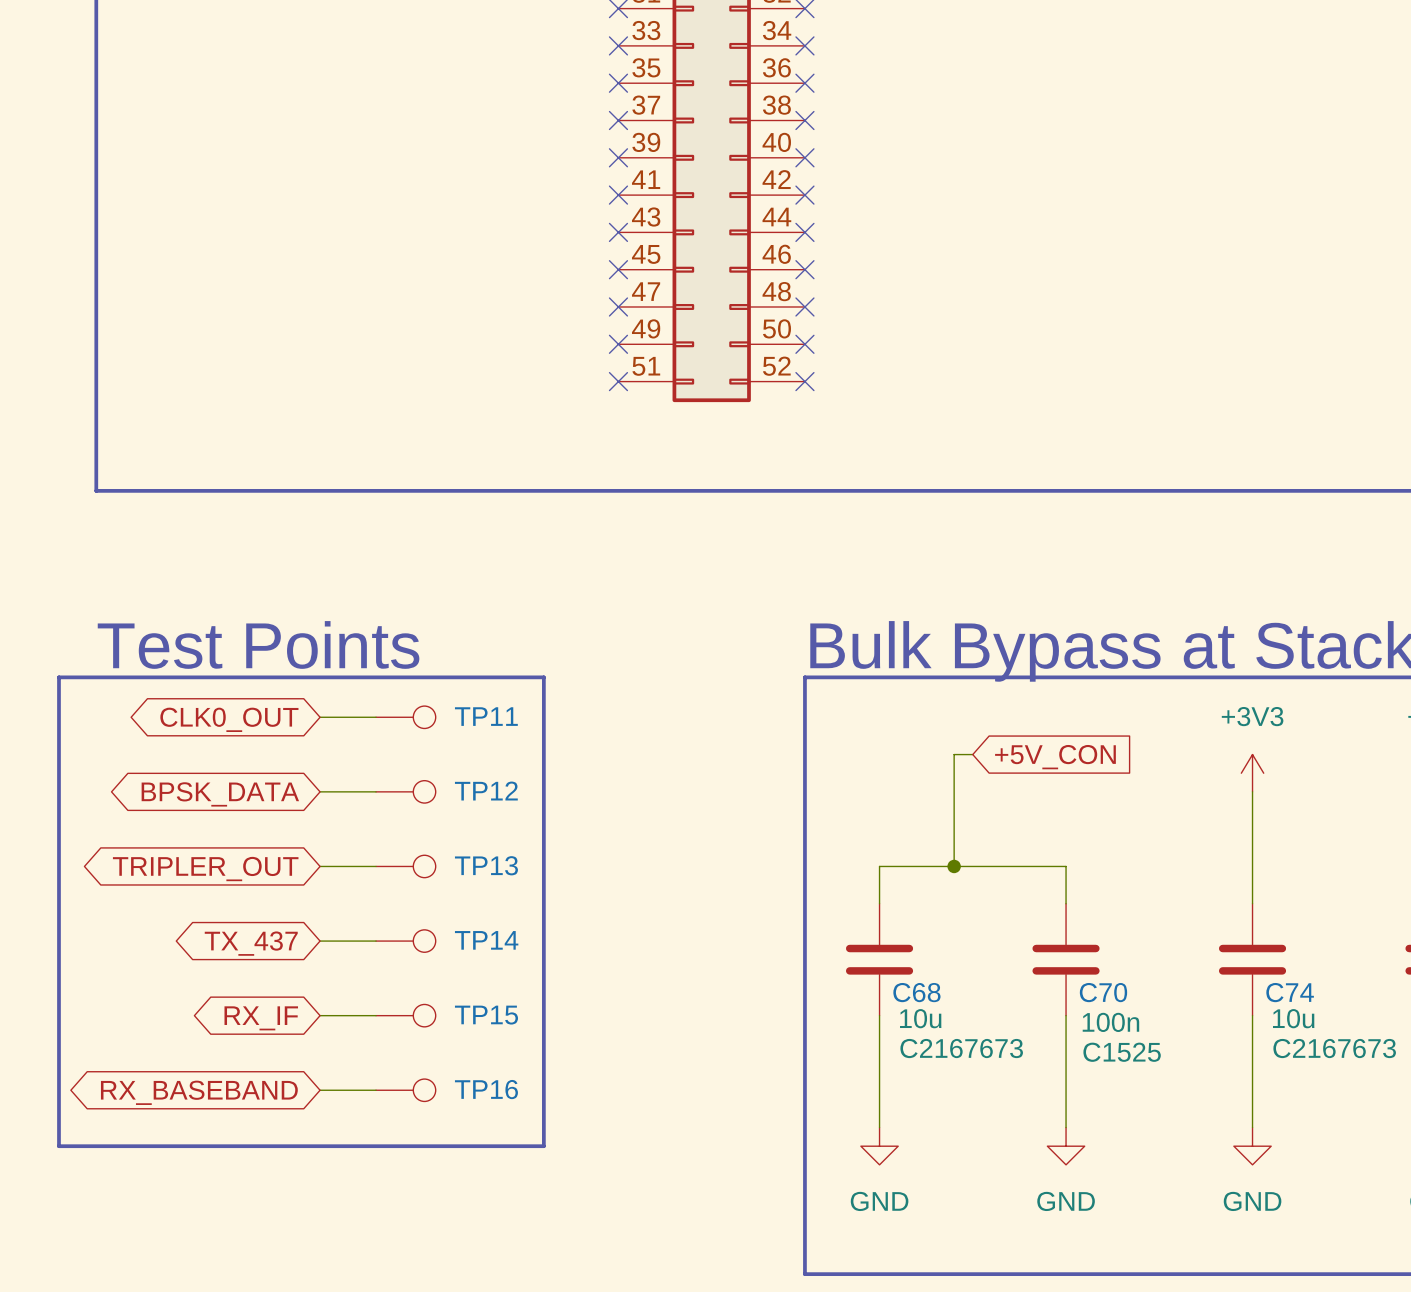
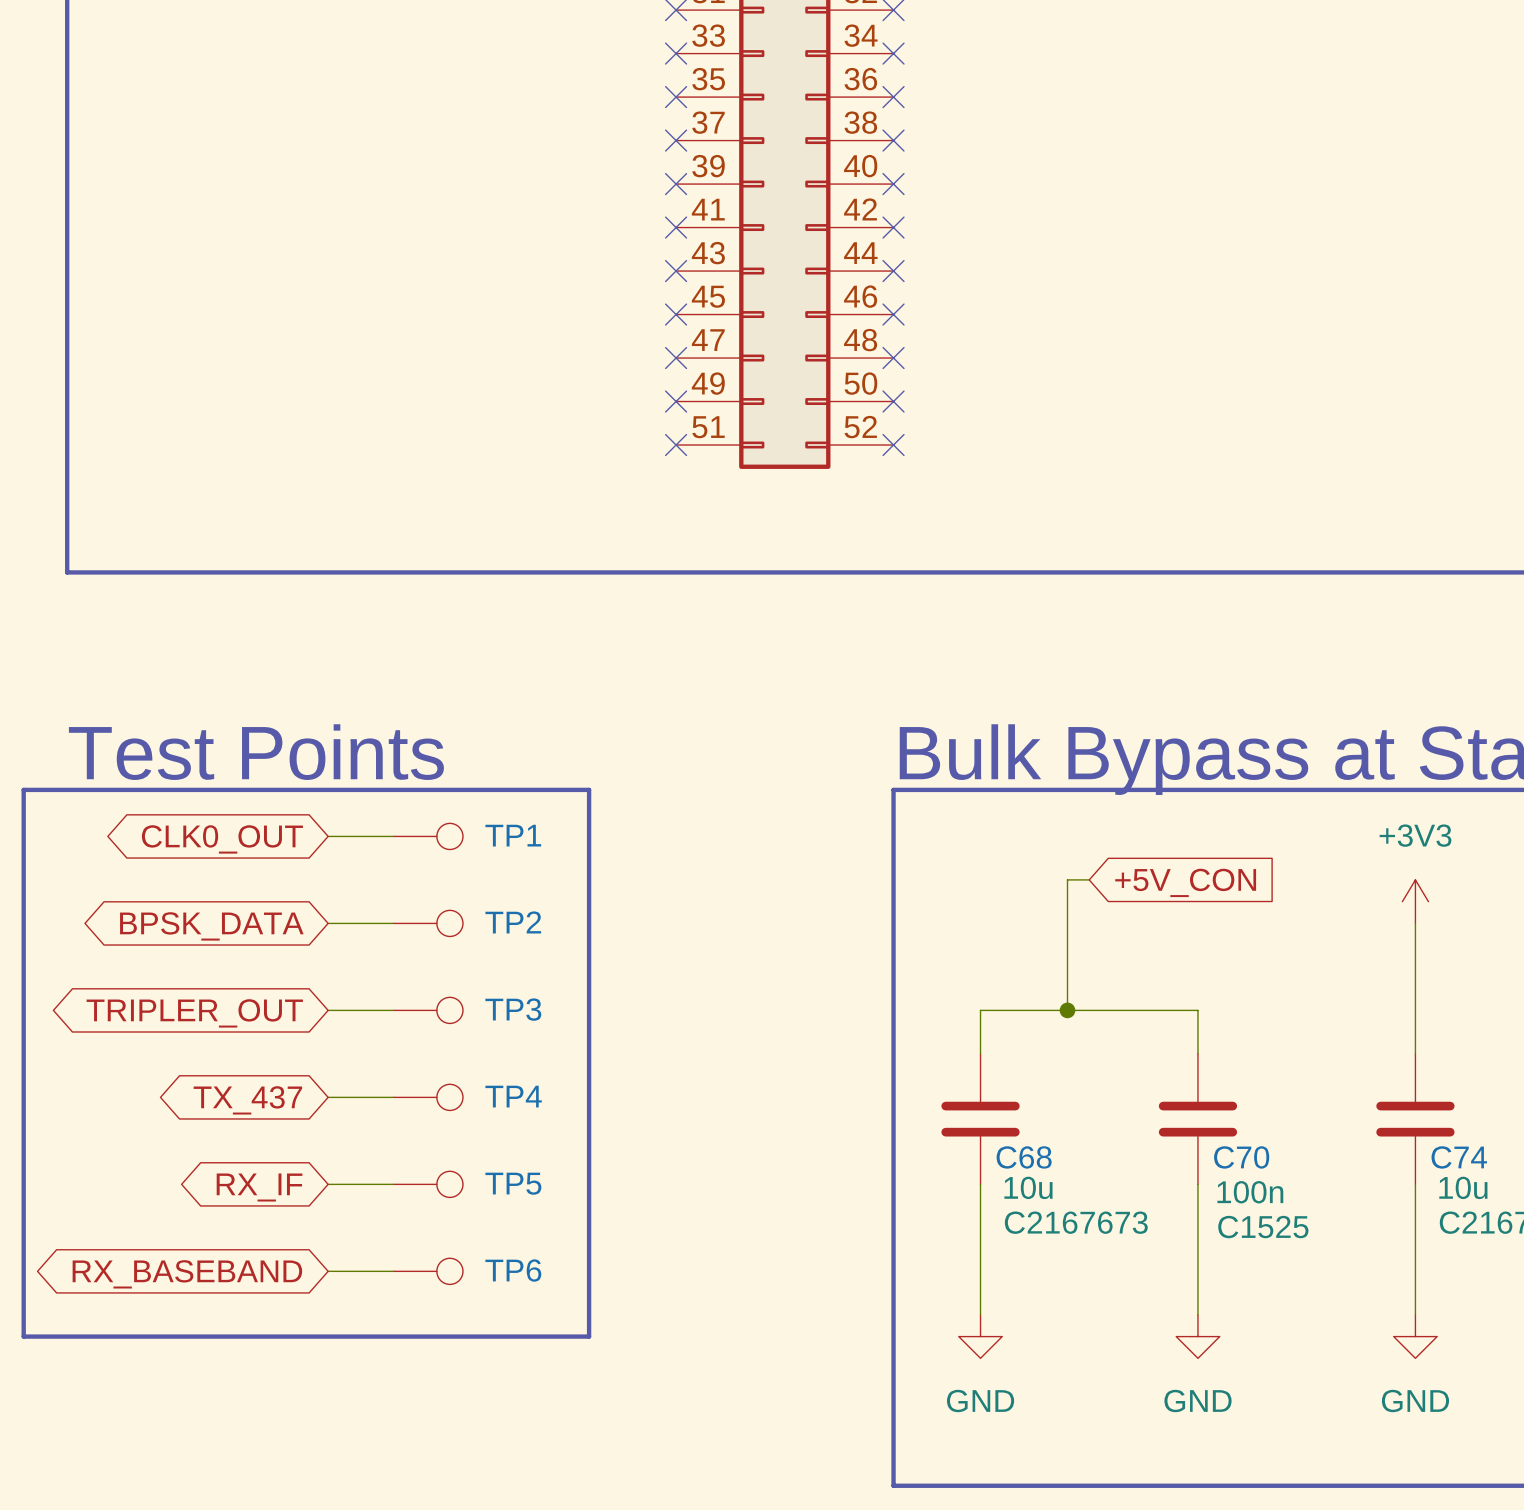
TP11 name: TP11 (486, 716) -> TP1 (513, 835)
TP12 name: TP12 (486, 791) -> TP2 (513, 922)
TP13 name: TP13 (486, 865) -> TP3 (513, 1009)
TP14 name: TP14 (486, 940) -> TP4 (513, 1096)
TP15 name: TP15 (486, 1015) -> TP5 (513, 1183)
TP16 name: TP16 (486, 1089) -> TP6 (513, 1270)

